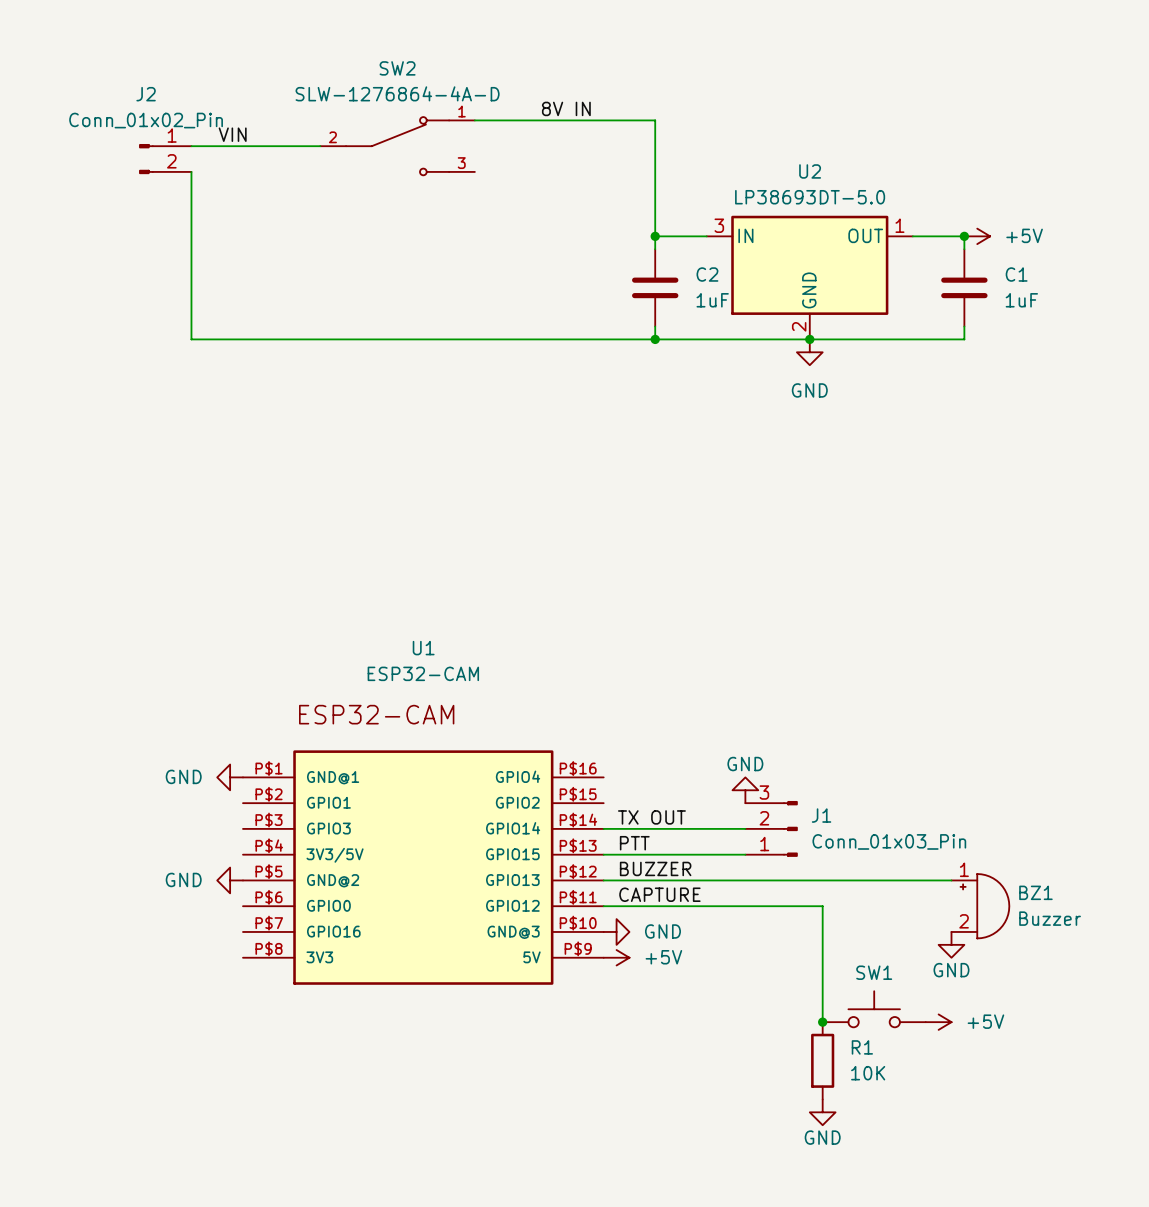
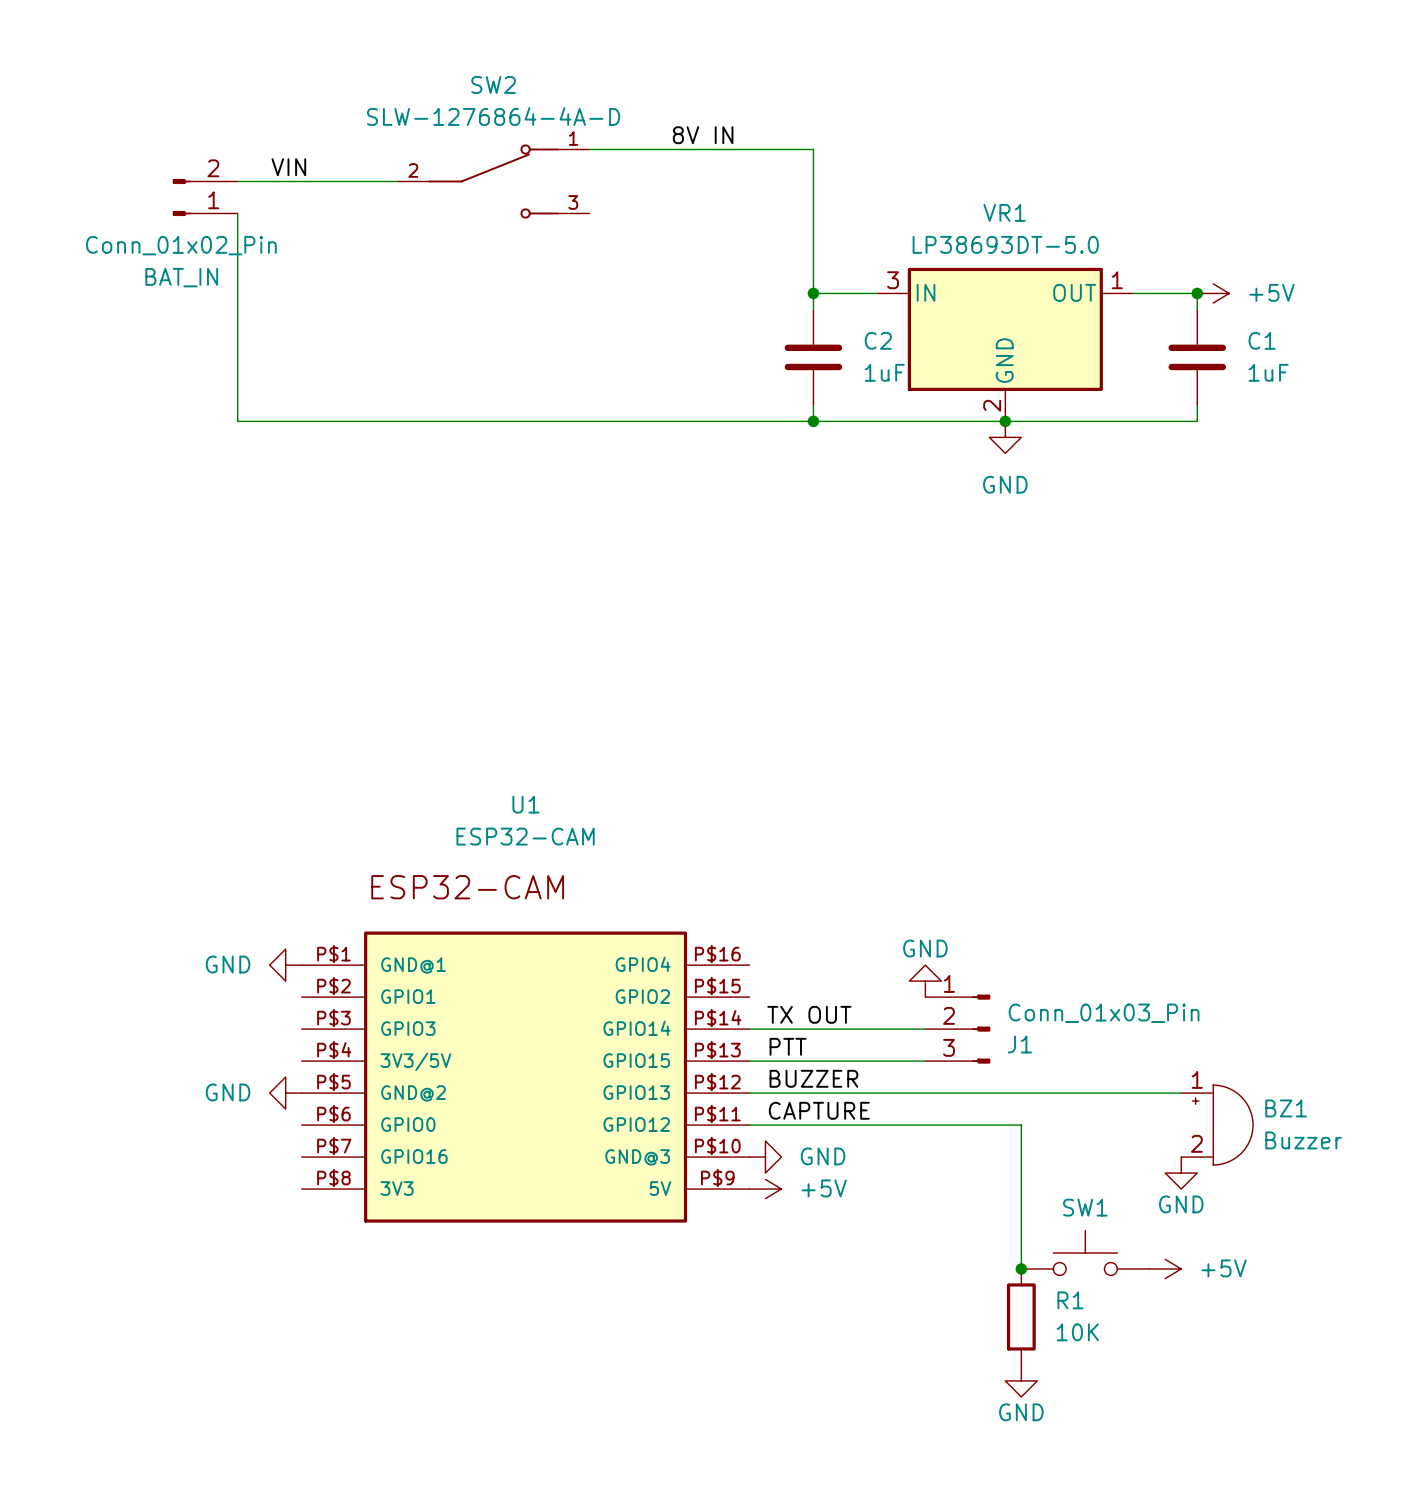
J2 name: J2 (146, 94) -> BAT_IN (181, 277)
J2 flip: as is (146, 159) -> up-down (181, 197)
U2 name: U2 (810, 171) -> VR1 (1004, 212)
J1 flip: as is (790, 828) -> up-down (981, 1029)

